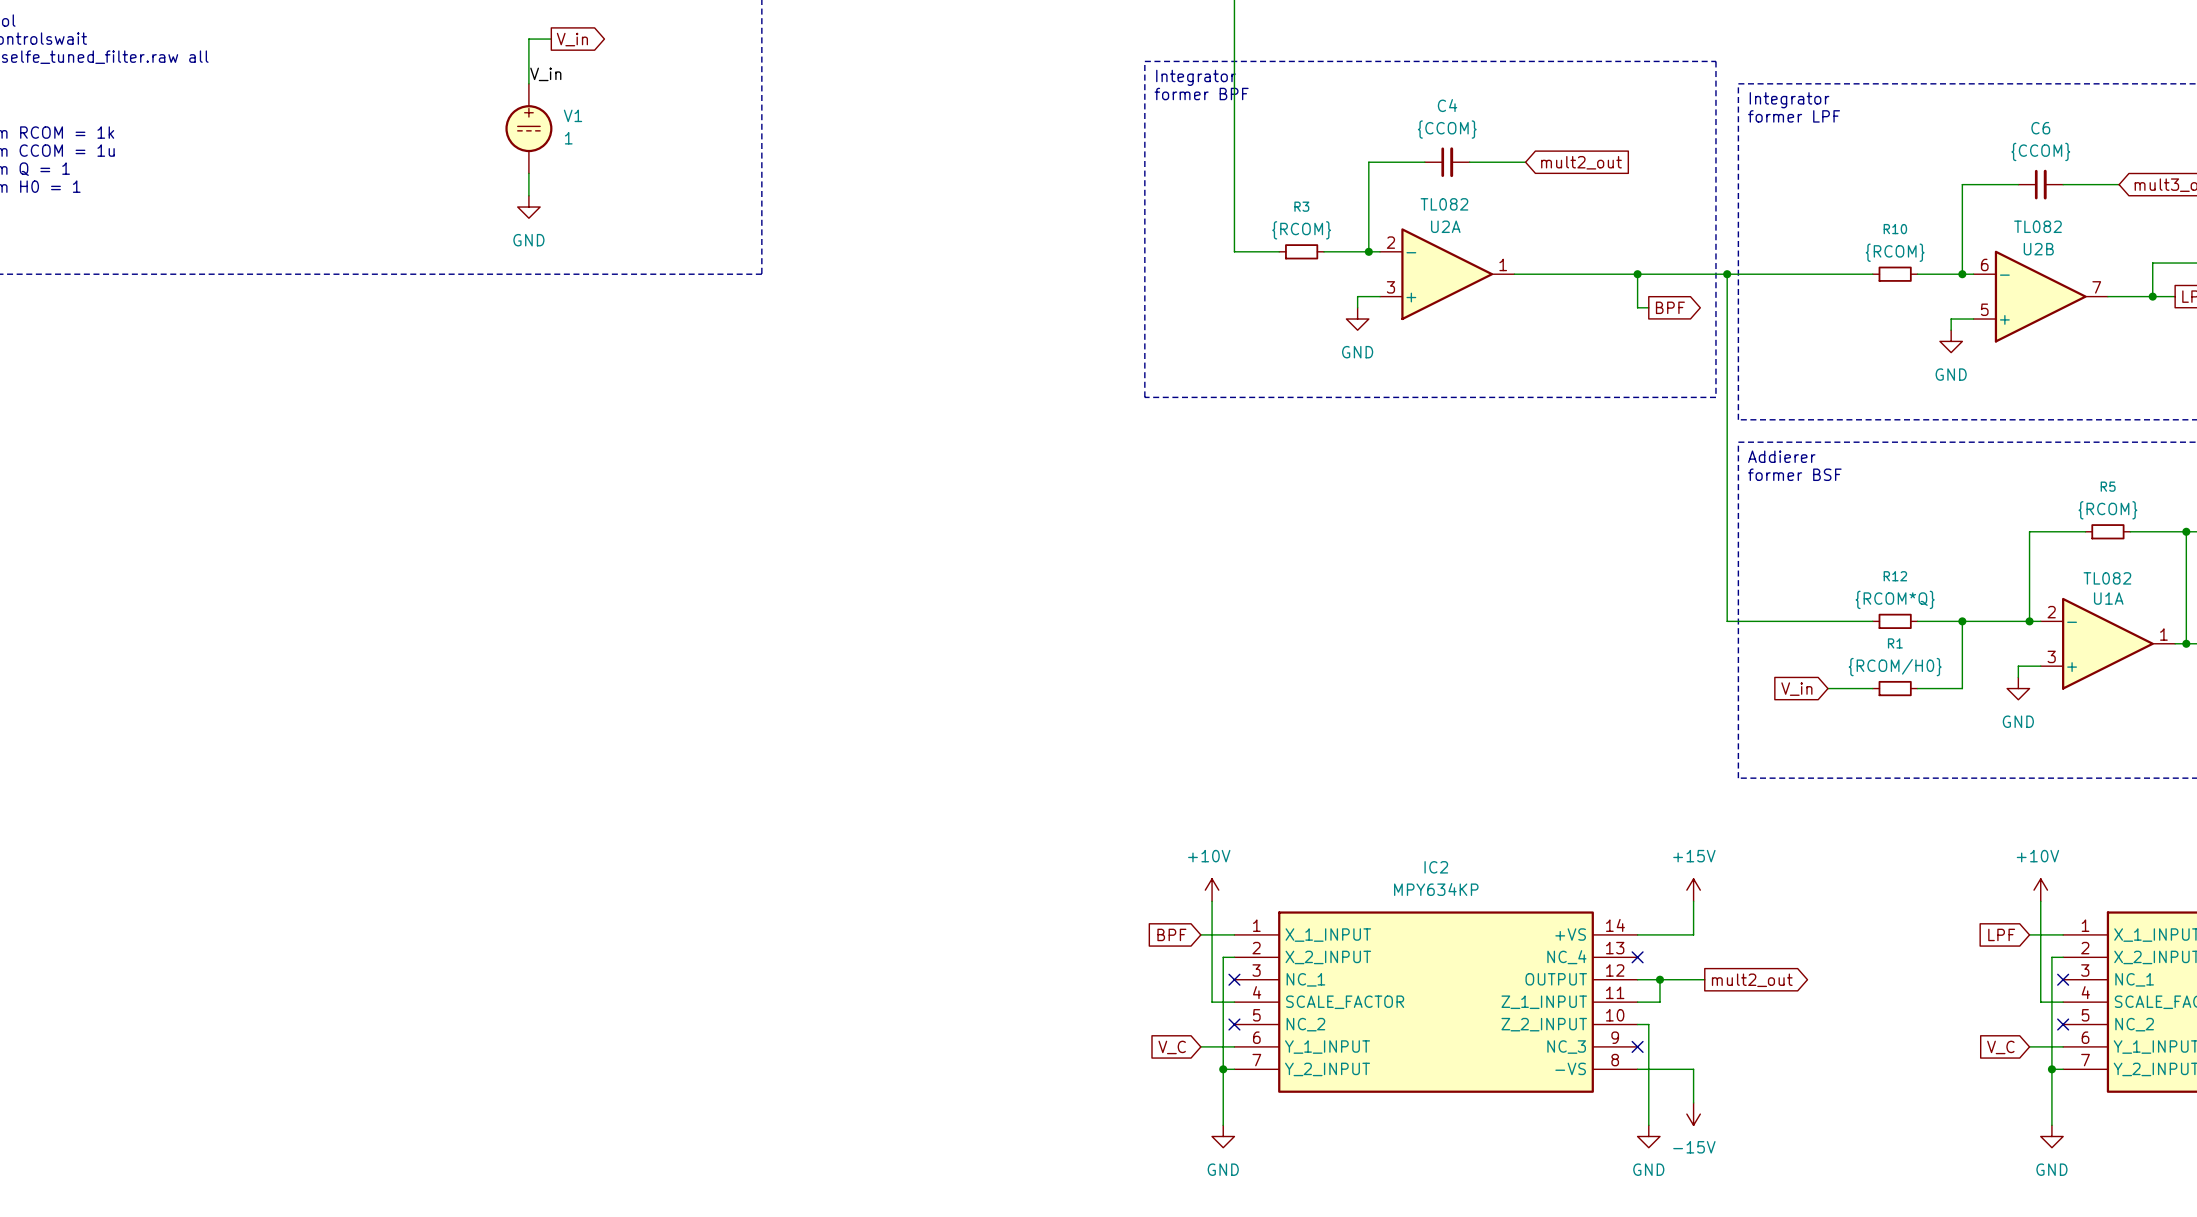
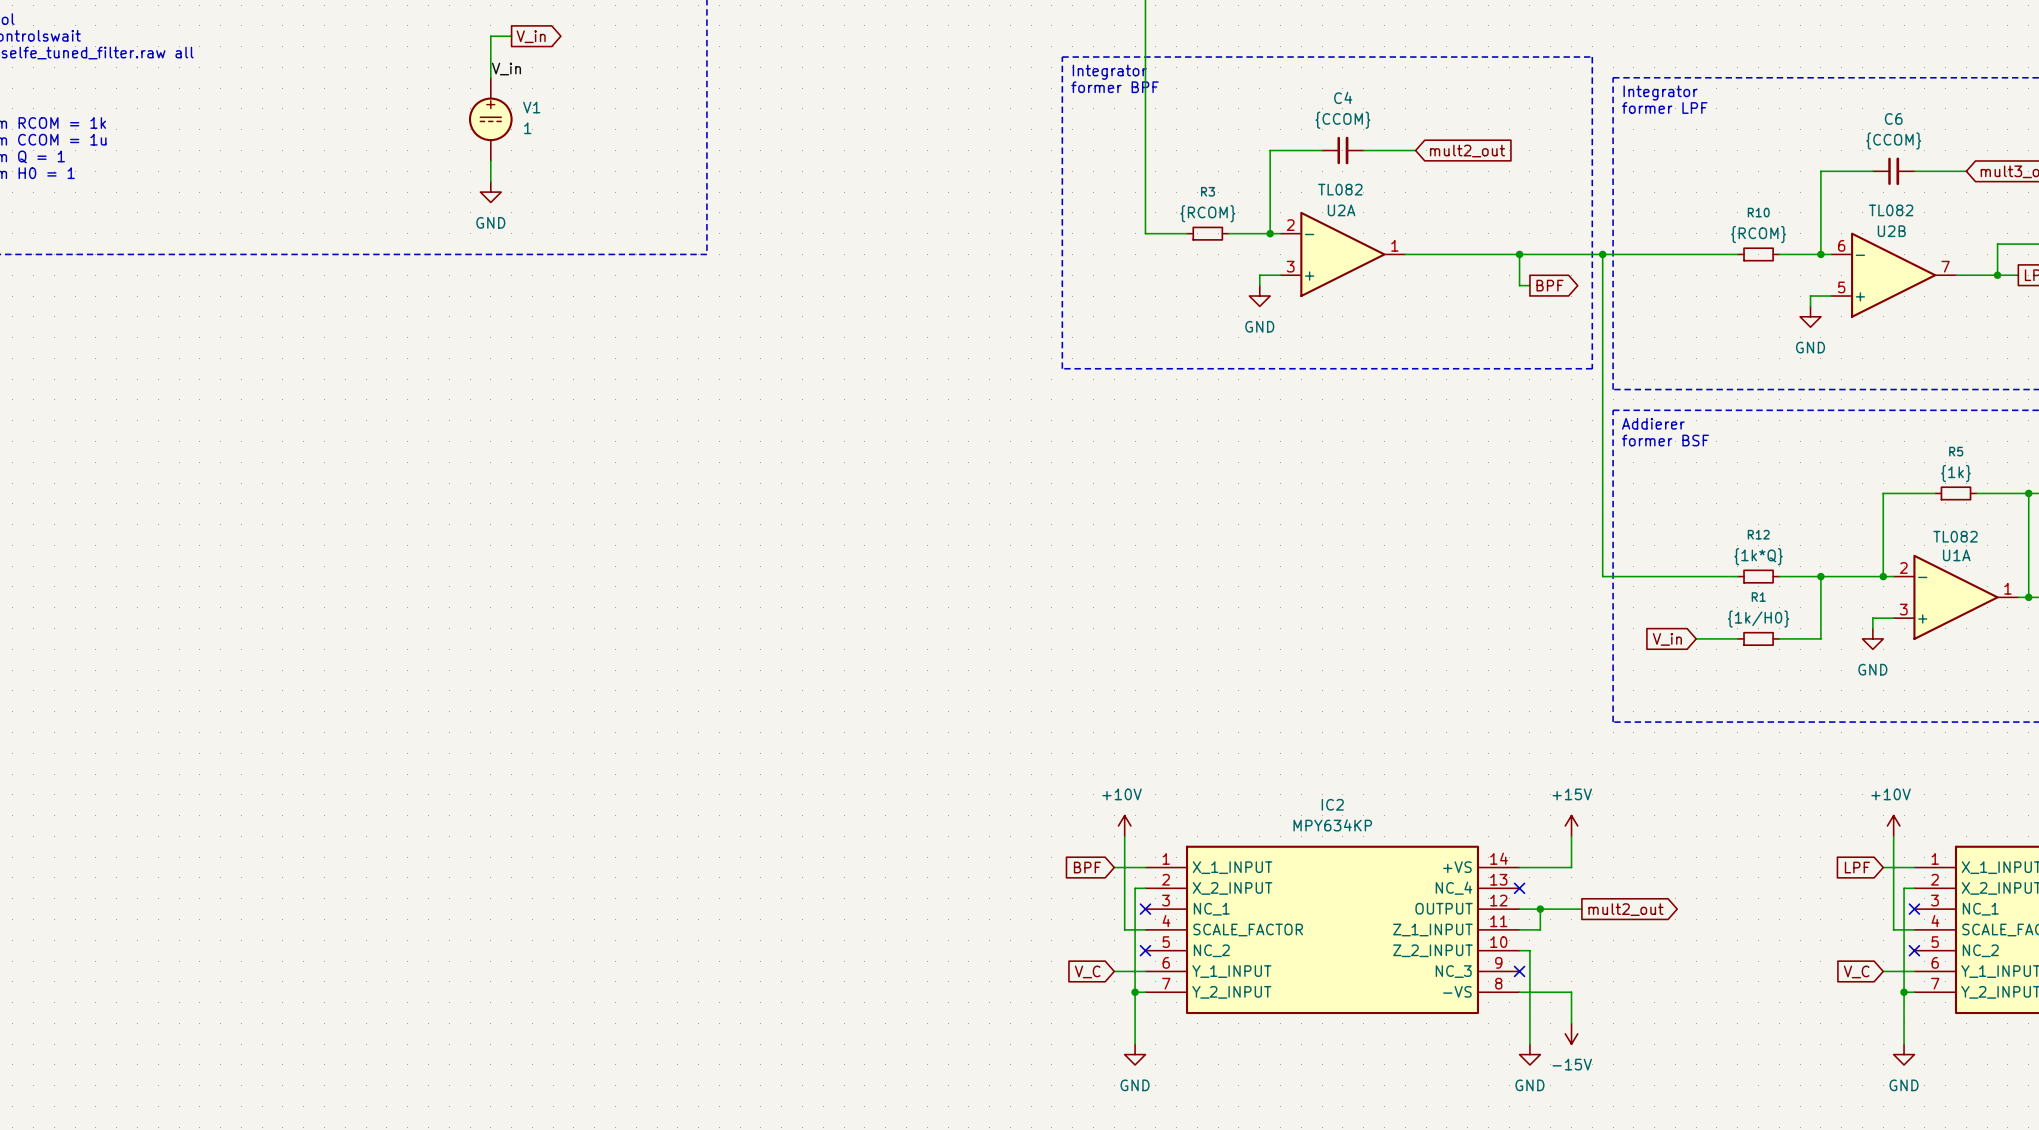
R5 value: {RCOM} (2107, 510) -> {1k} (1955, 473)
R12 value: {RCOM*Q} (1895, 599) -> {1k*Q} (1758, 556)
R1 value: {RCOM/H0} (1895, 667) -> {1k/H0} (1758, 618)

